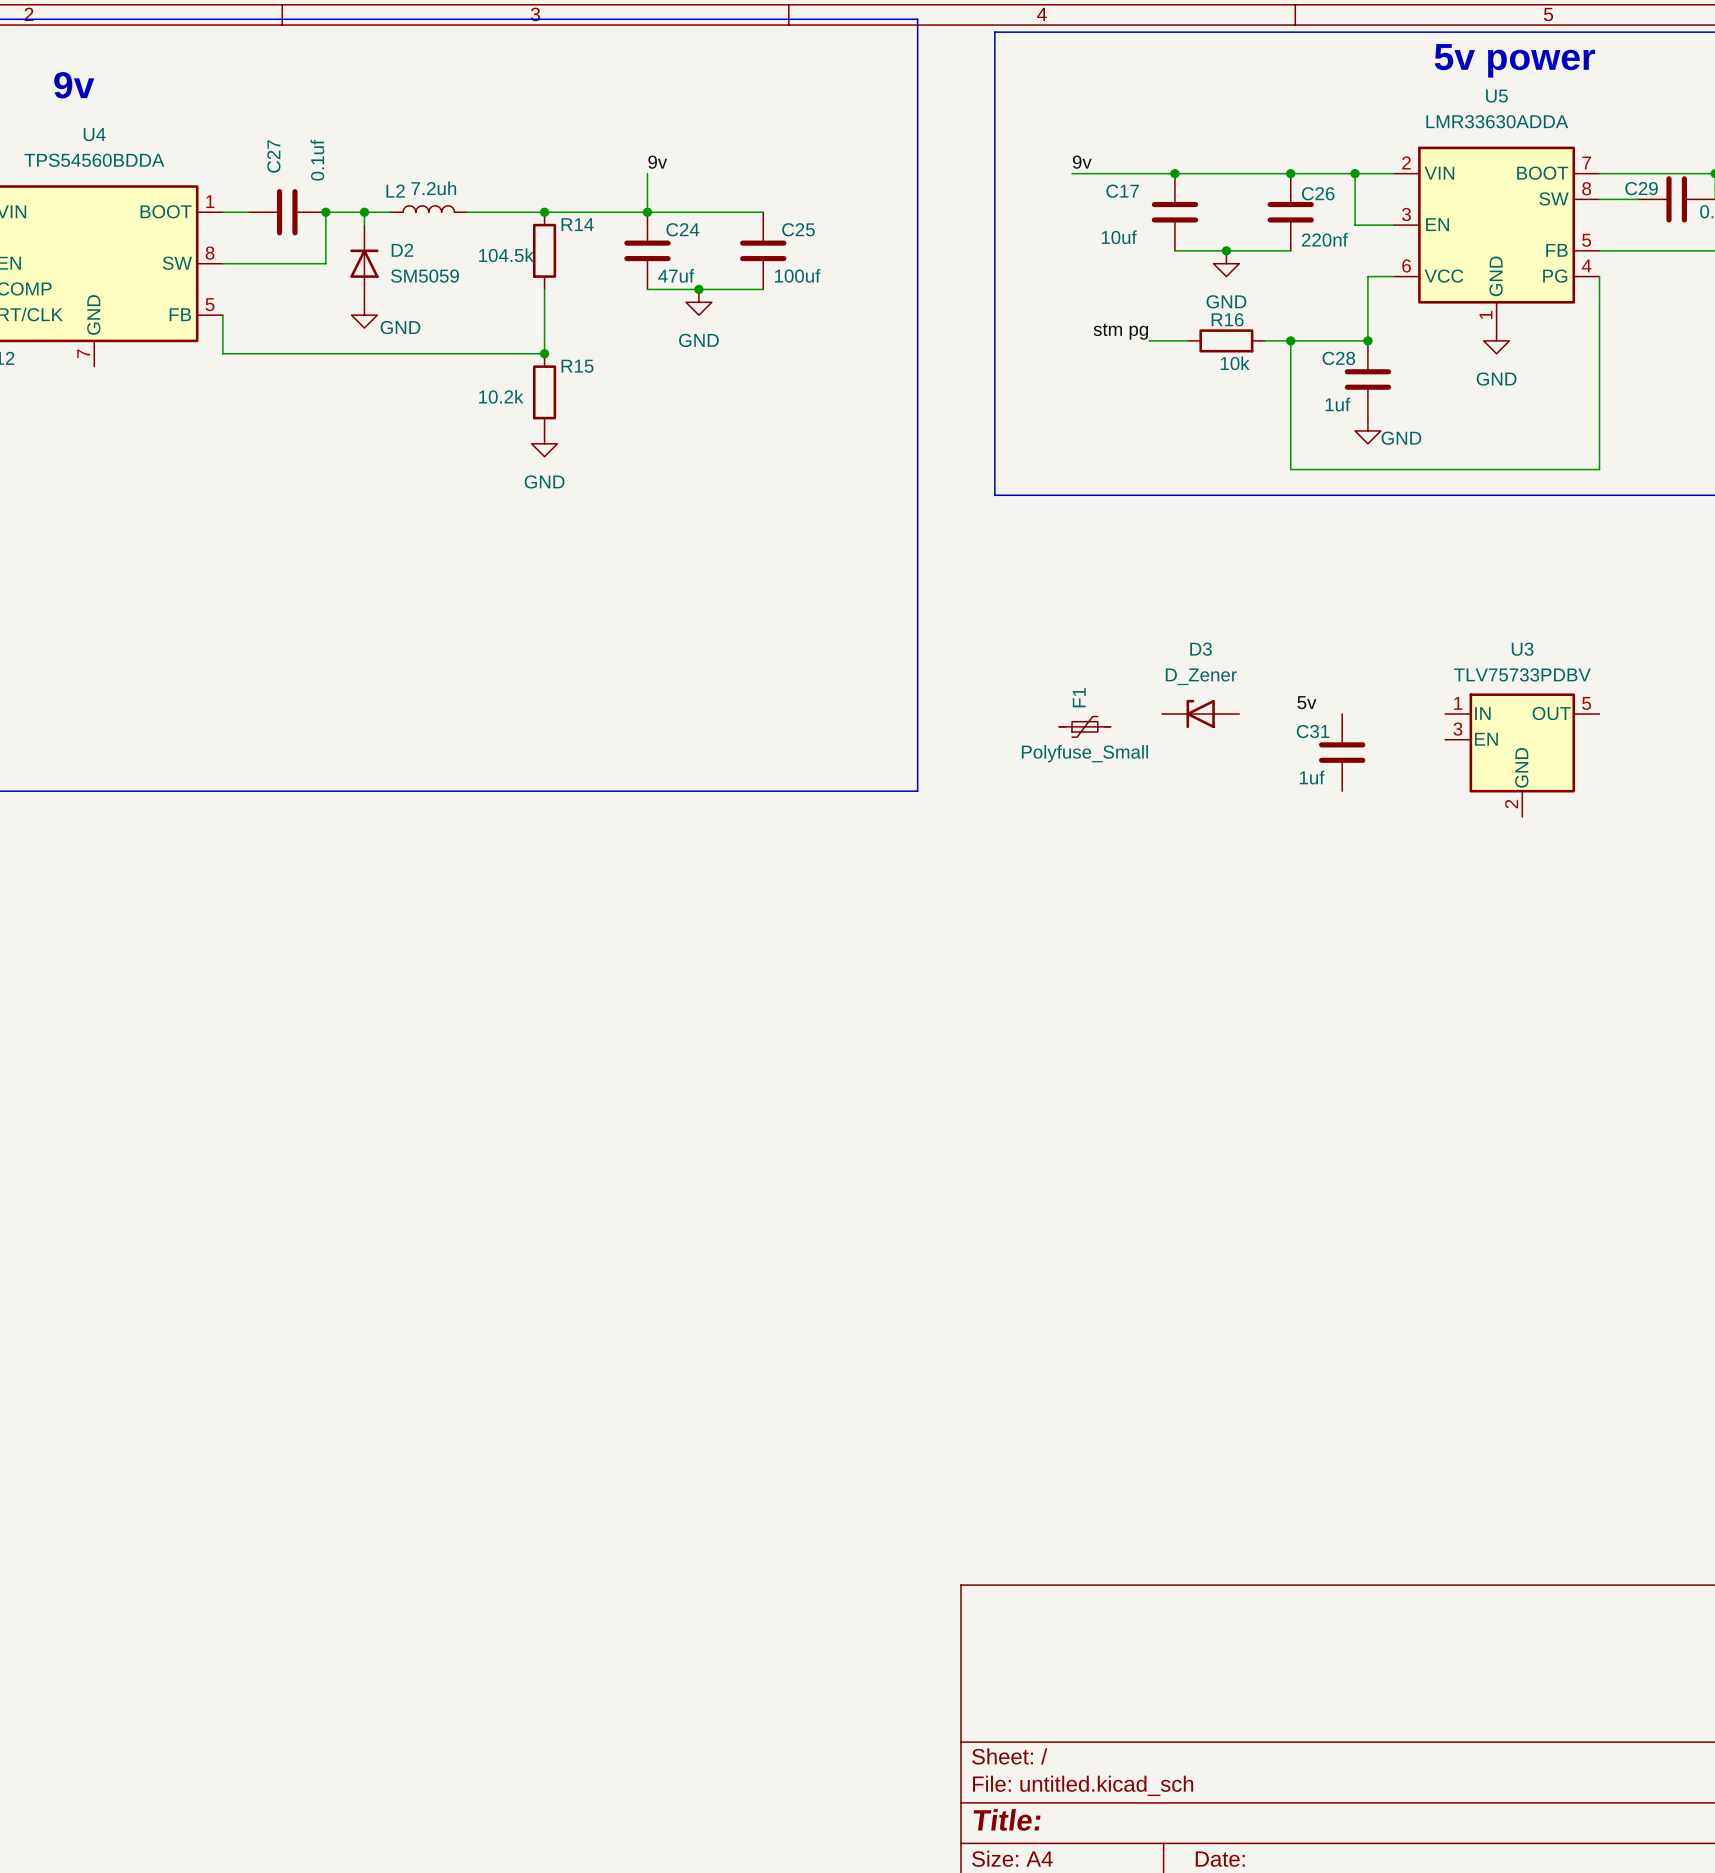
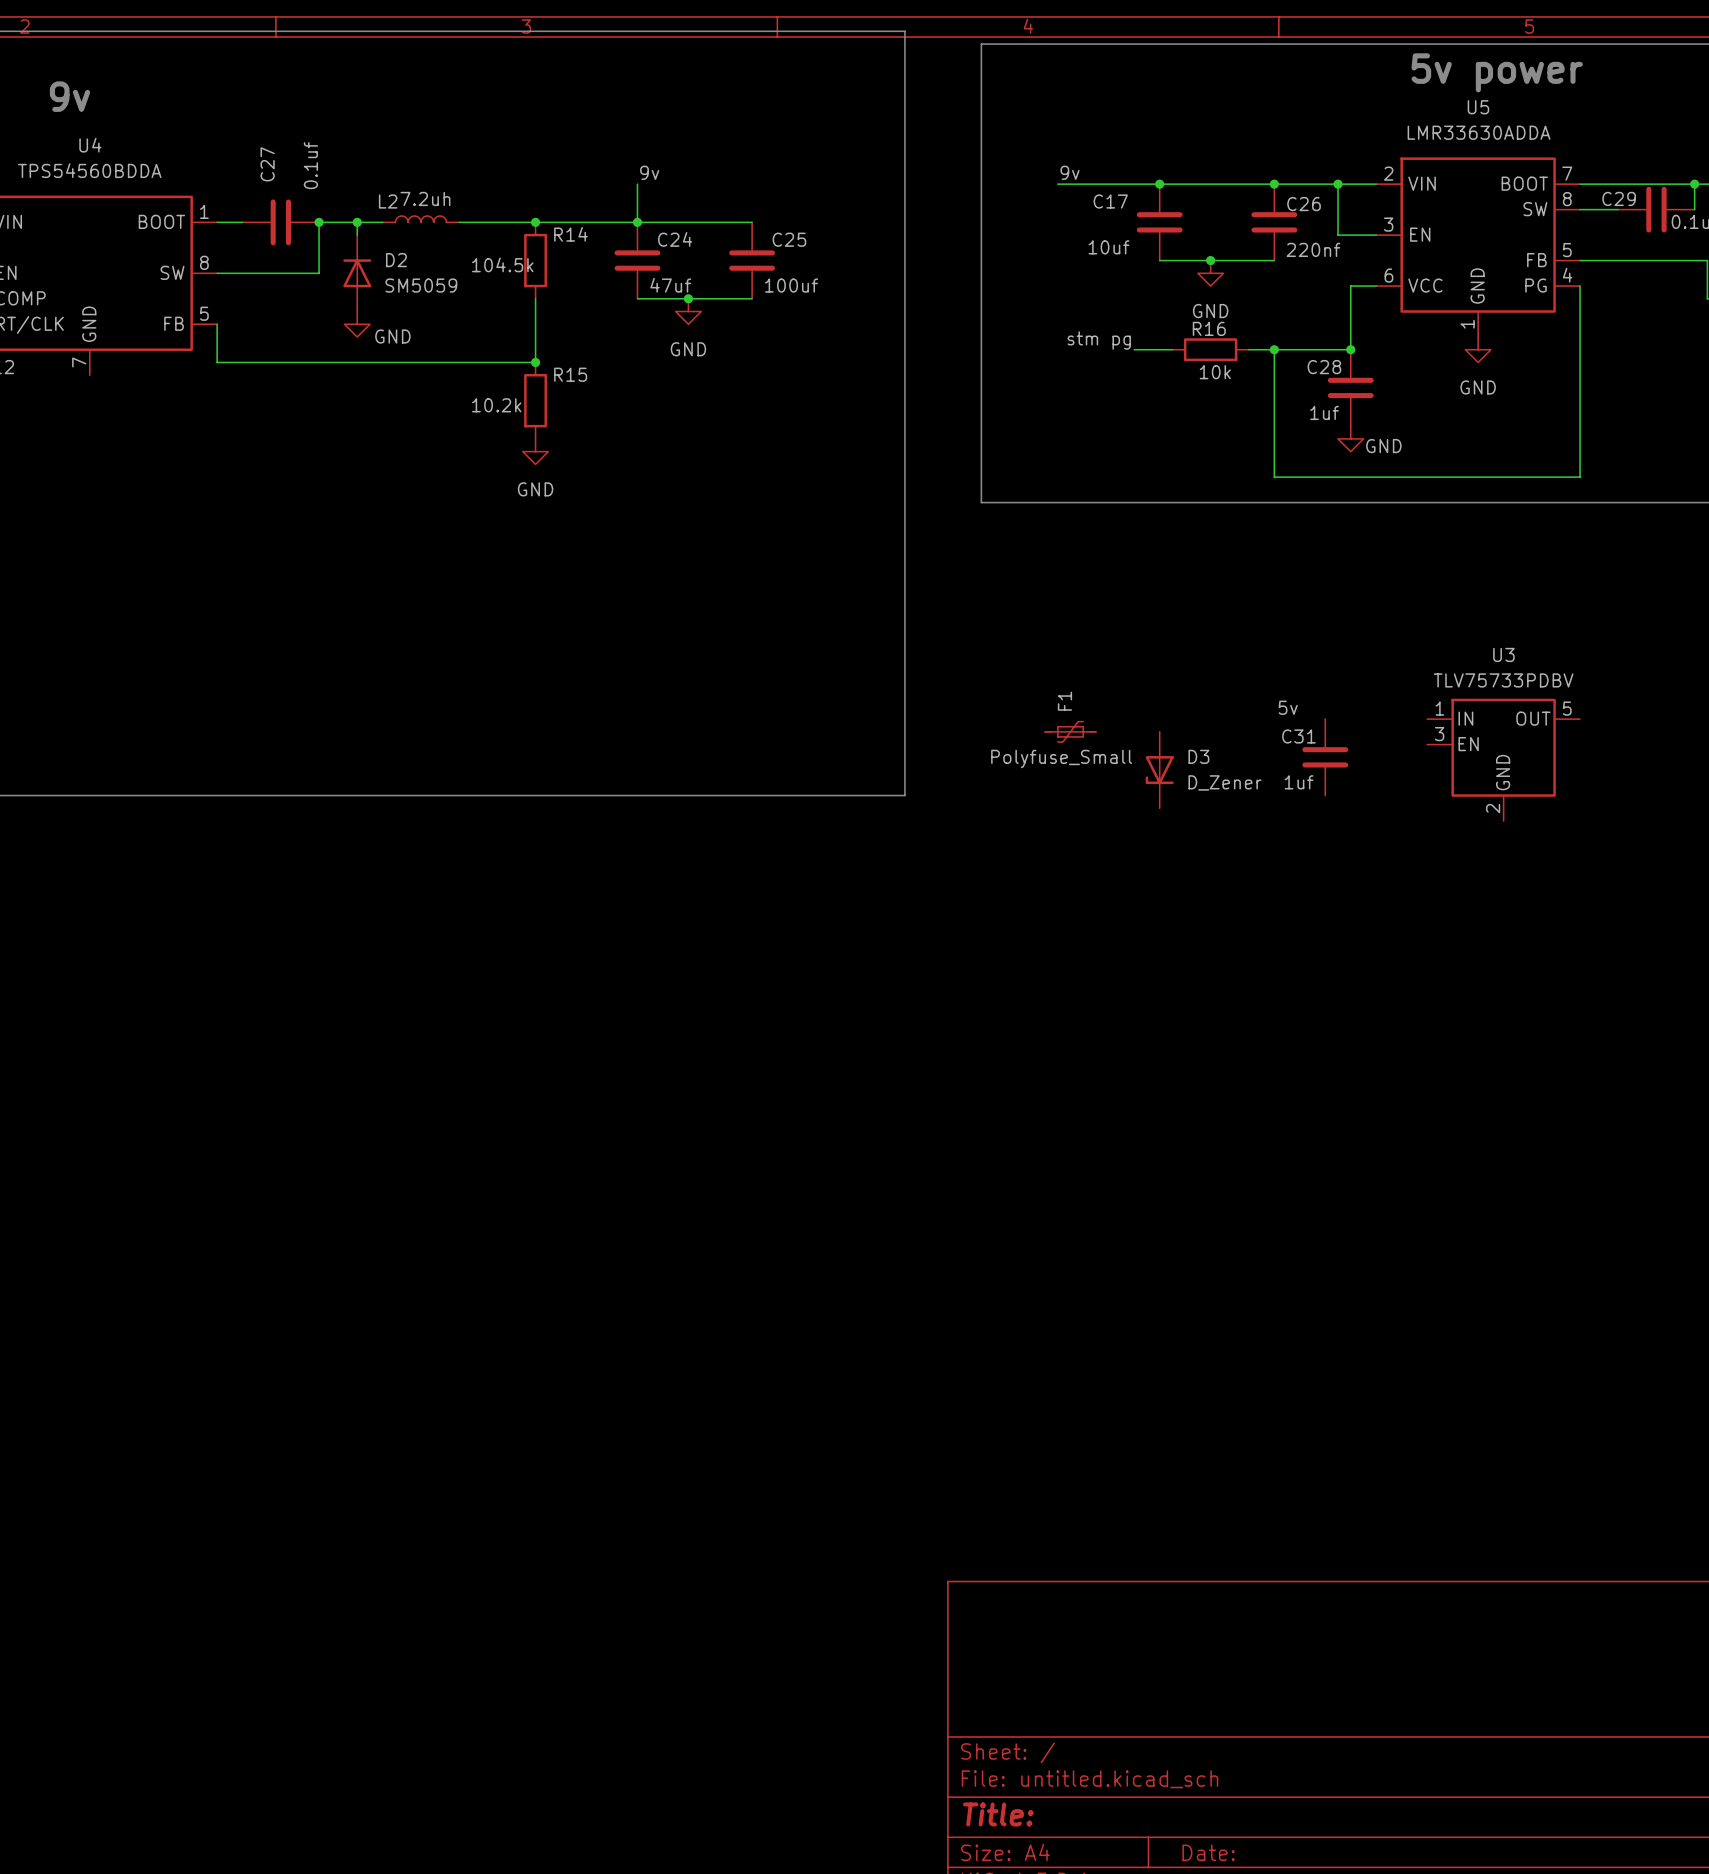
D3 name position: D3 (1201, 649) -> D3 (1198, 756)
D3 value position: D_Zener (1201, 676) -> D_Zener (1225, 782)
D3 rotation: 0° (1200, 713) -> 90° counterclockwise (1159, 770)
D3 position: (1200, 713) -> (1159, 770)

